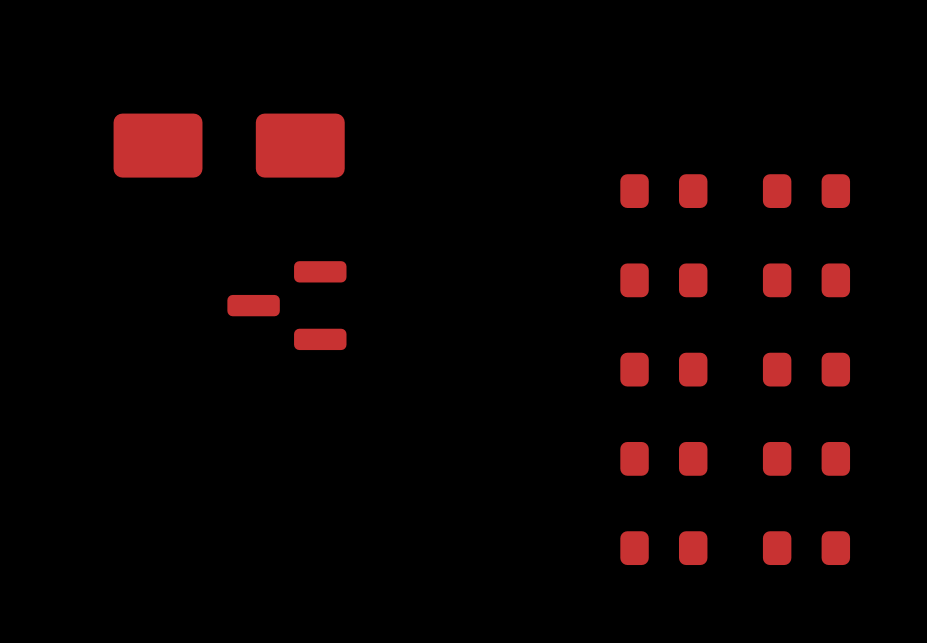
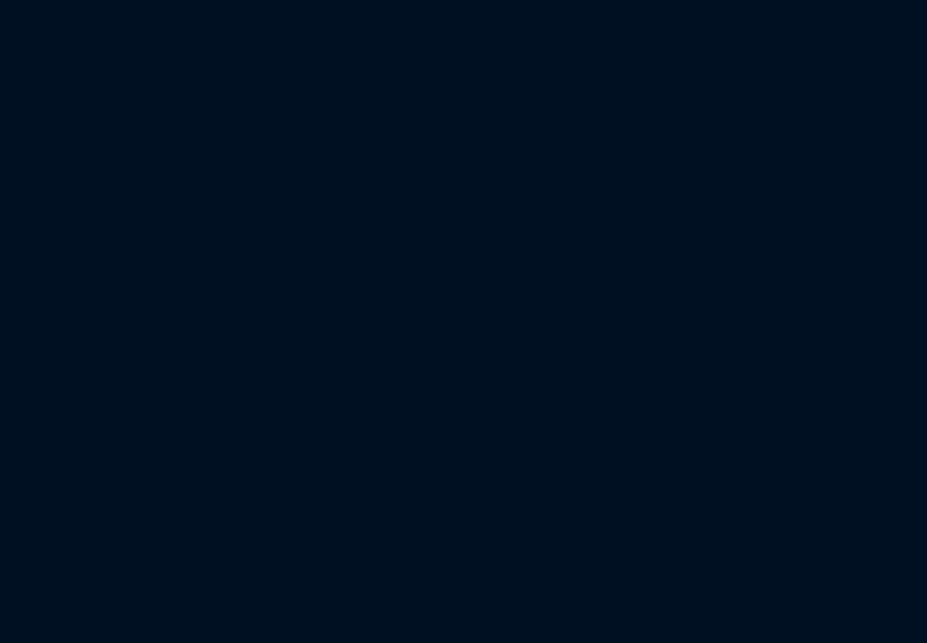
part: (229, 145) -> none
part: (663, 191) -> none
part: (806, 191) -> none
part: (663, 280) -> none
part: (806, 280) -> none
part: (286, 305) -> none
part: (663, 369) -> none
part: (806, 369) -> none
part: (663, 458) -> none
part: (806, 458) -> none
part: (663, 548) -> none
part: (806, 548) -> none

